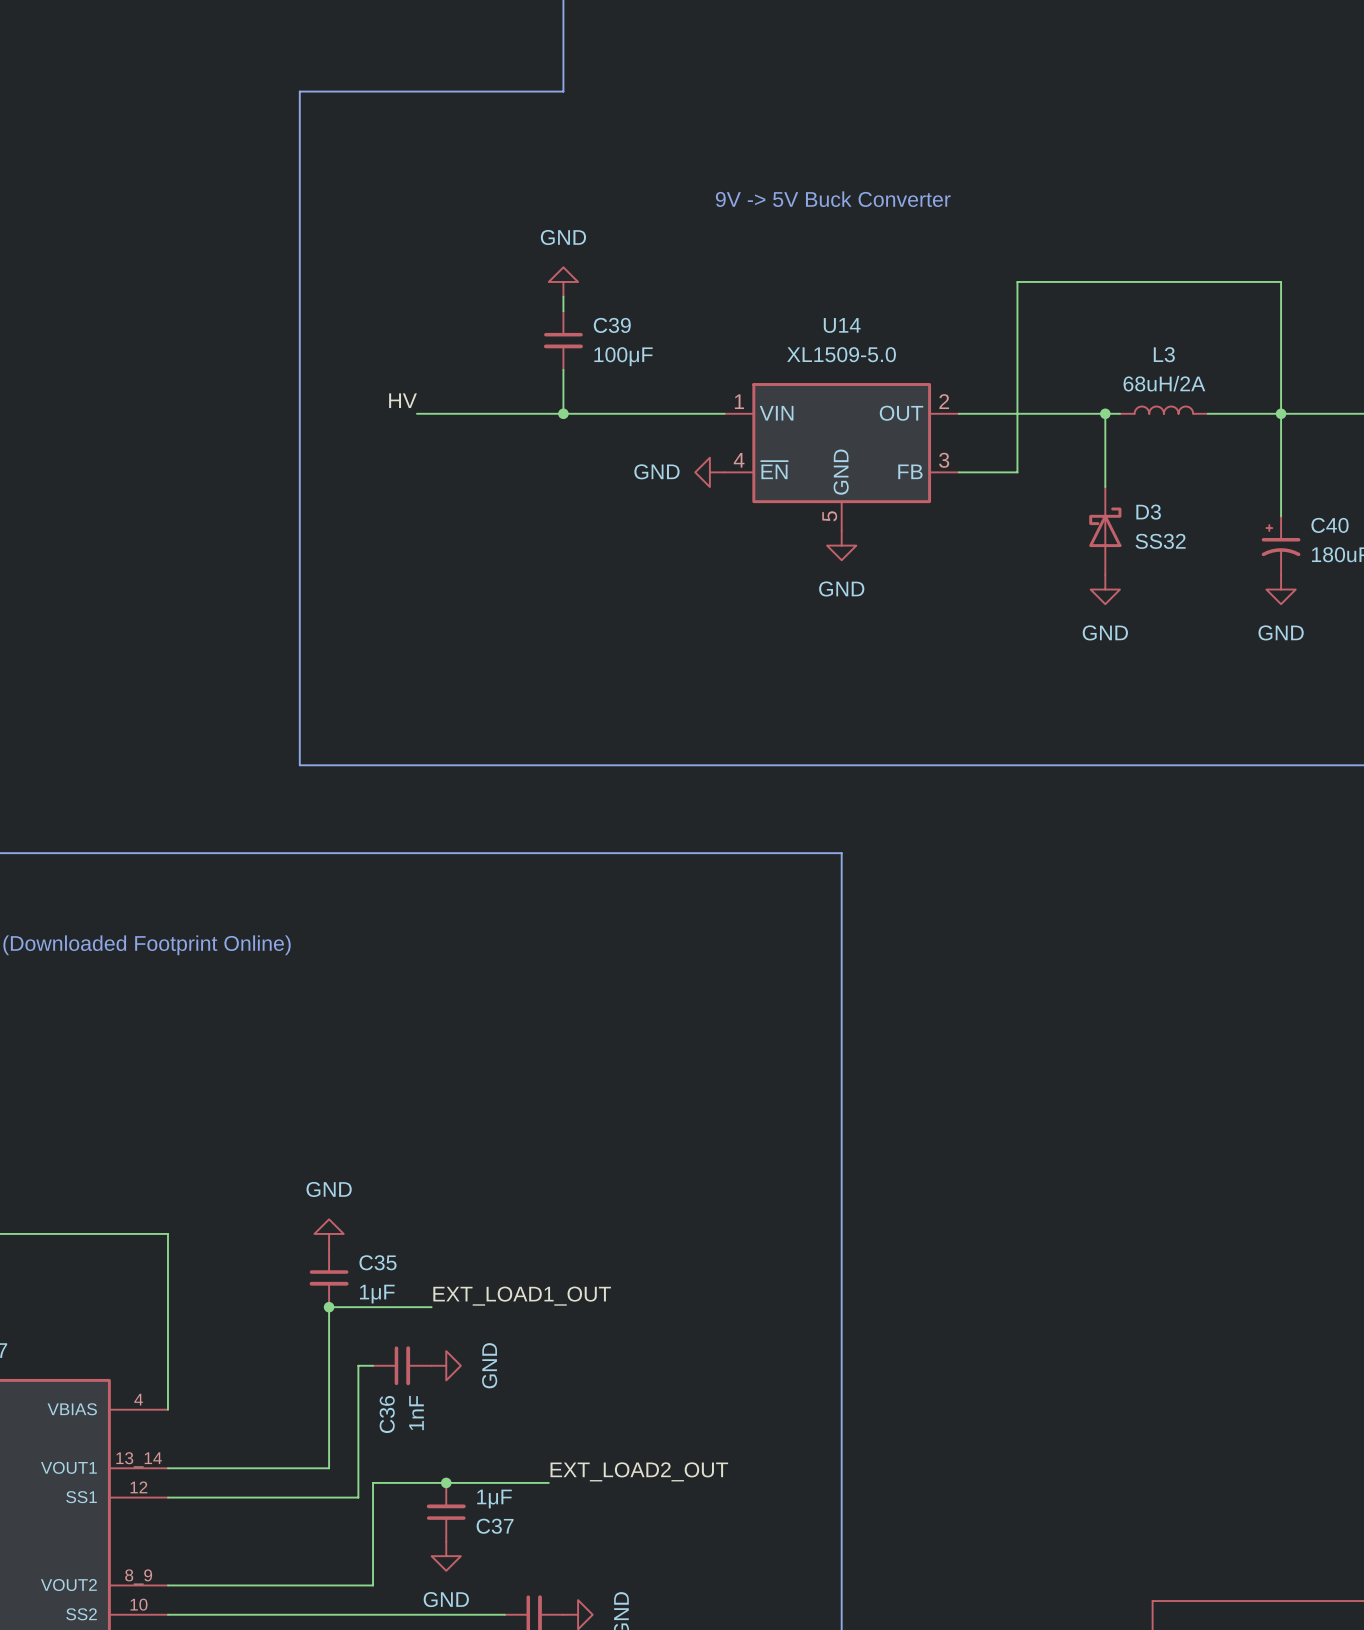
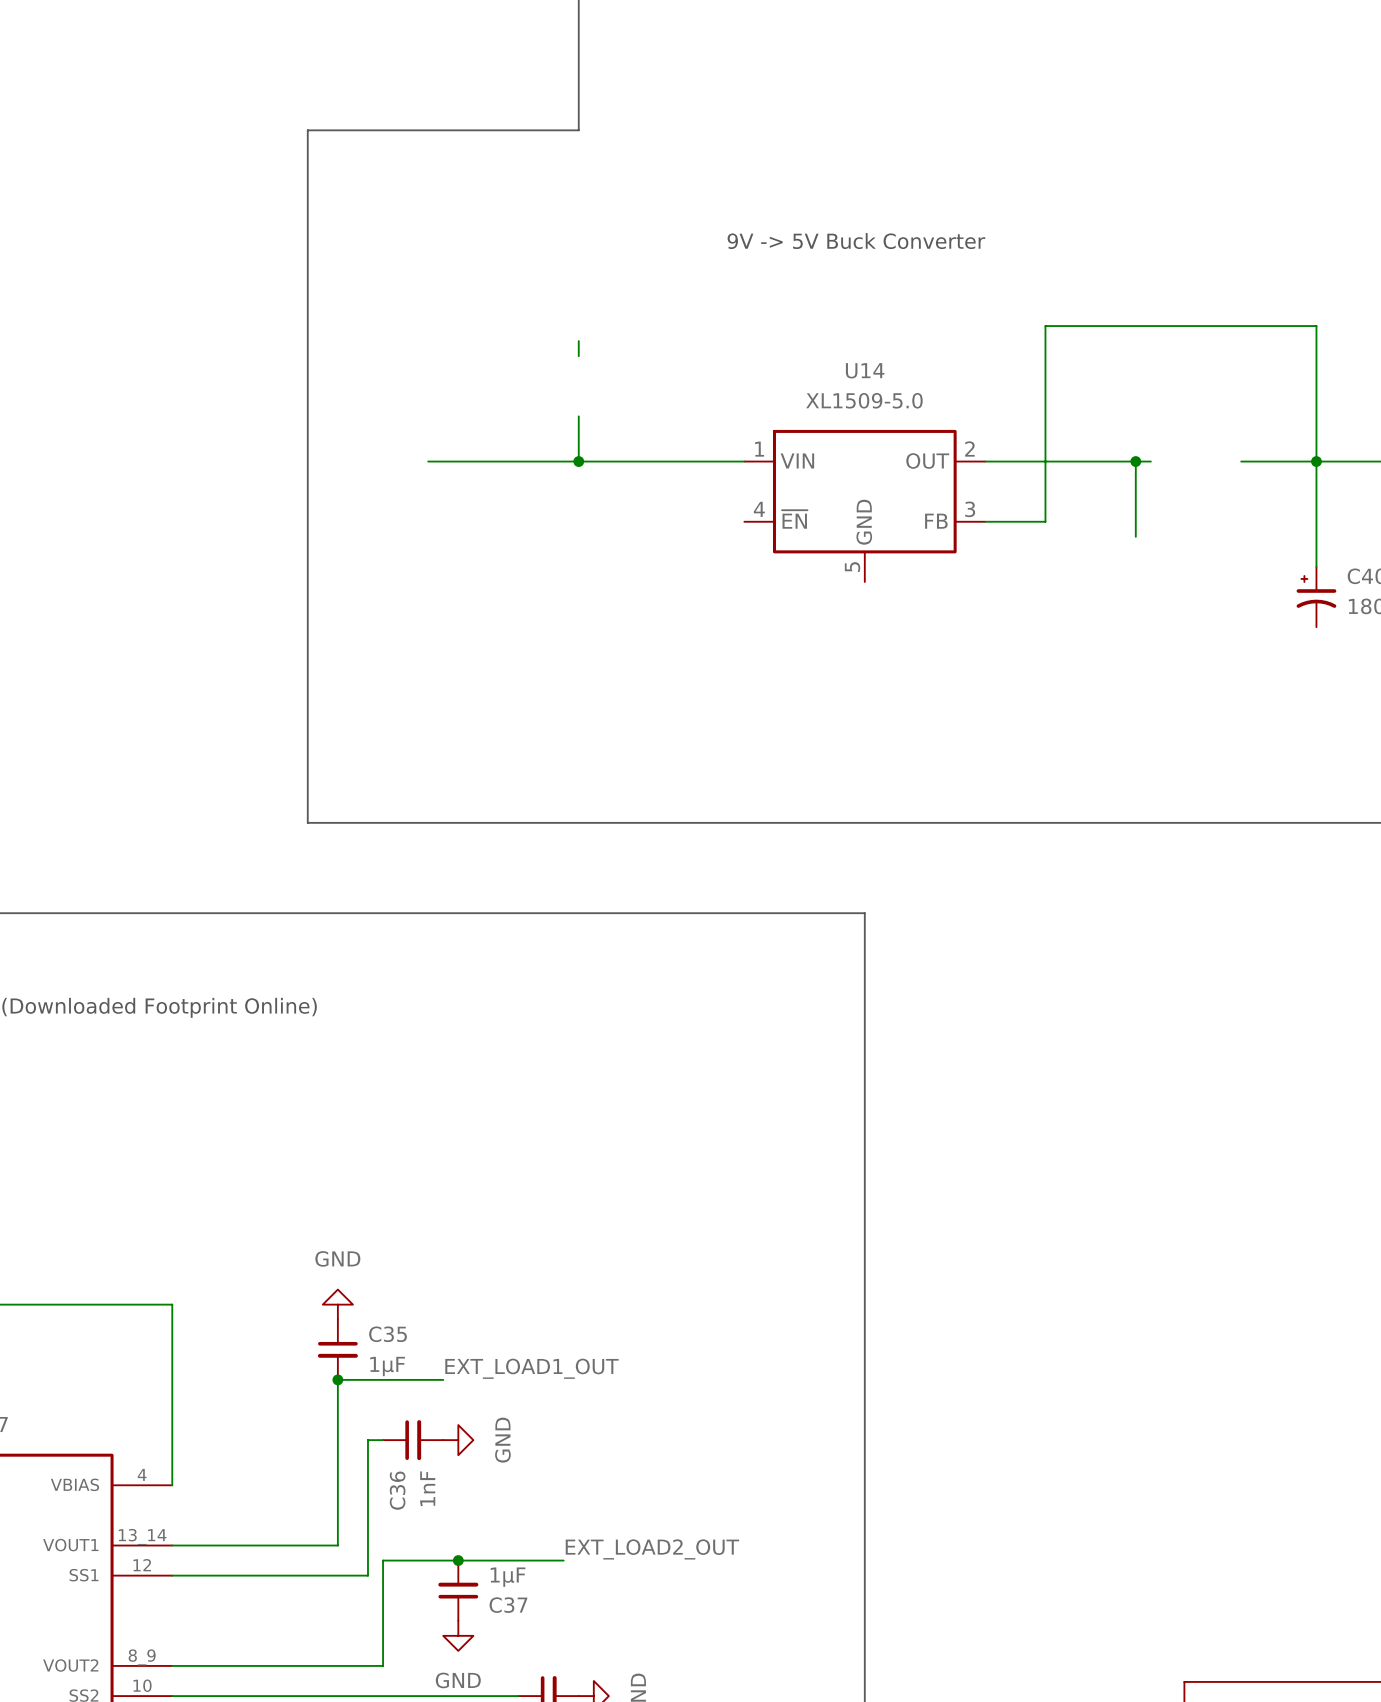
power symbol: GND (563, 281) -> none
C39: 100μF (563, 340) -> none
label: HV (403, 400) -> none
L3: 68uH/2A (1163, 410) -> none
power symbol: GND (709, 472) -> none
D3: SS32 (1105, 530) -> none
power symbol: GND (841, 545) -> none
power symbol: GND (1105, 589) -> none
power symbol: GND (1281, 589) -> none

